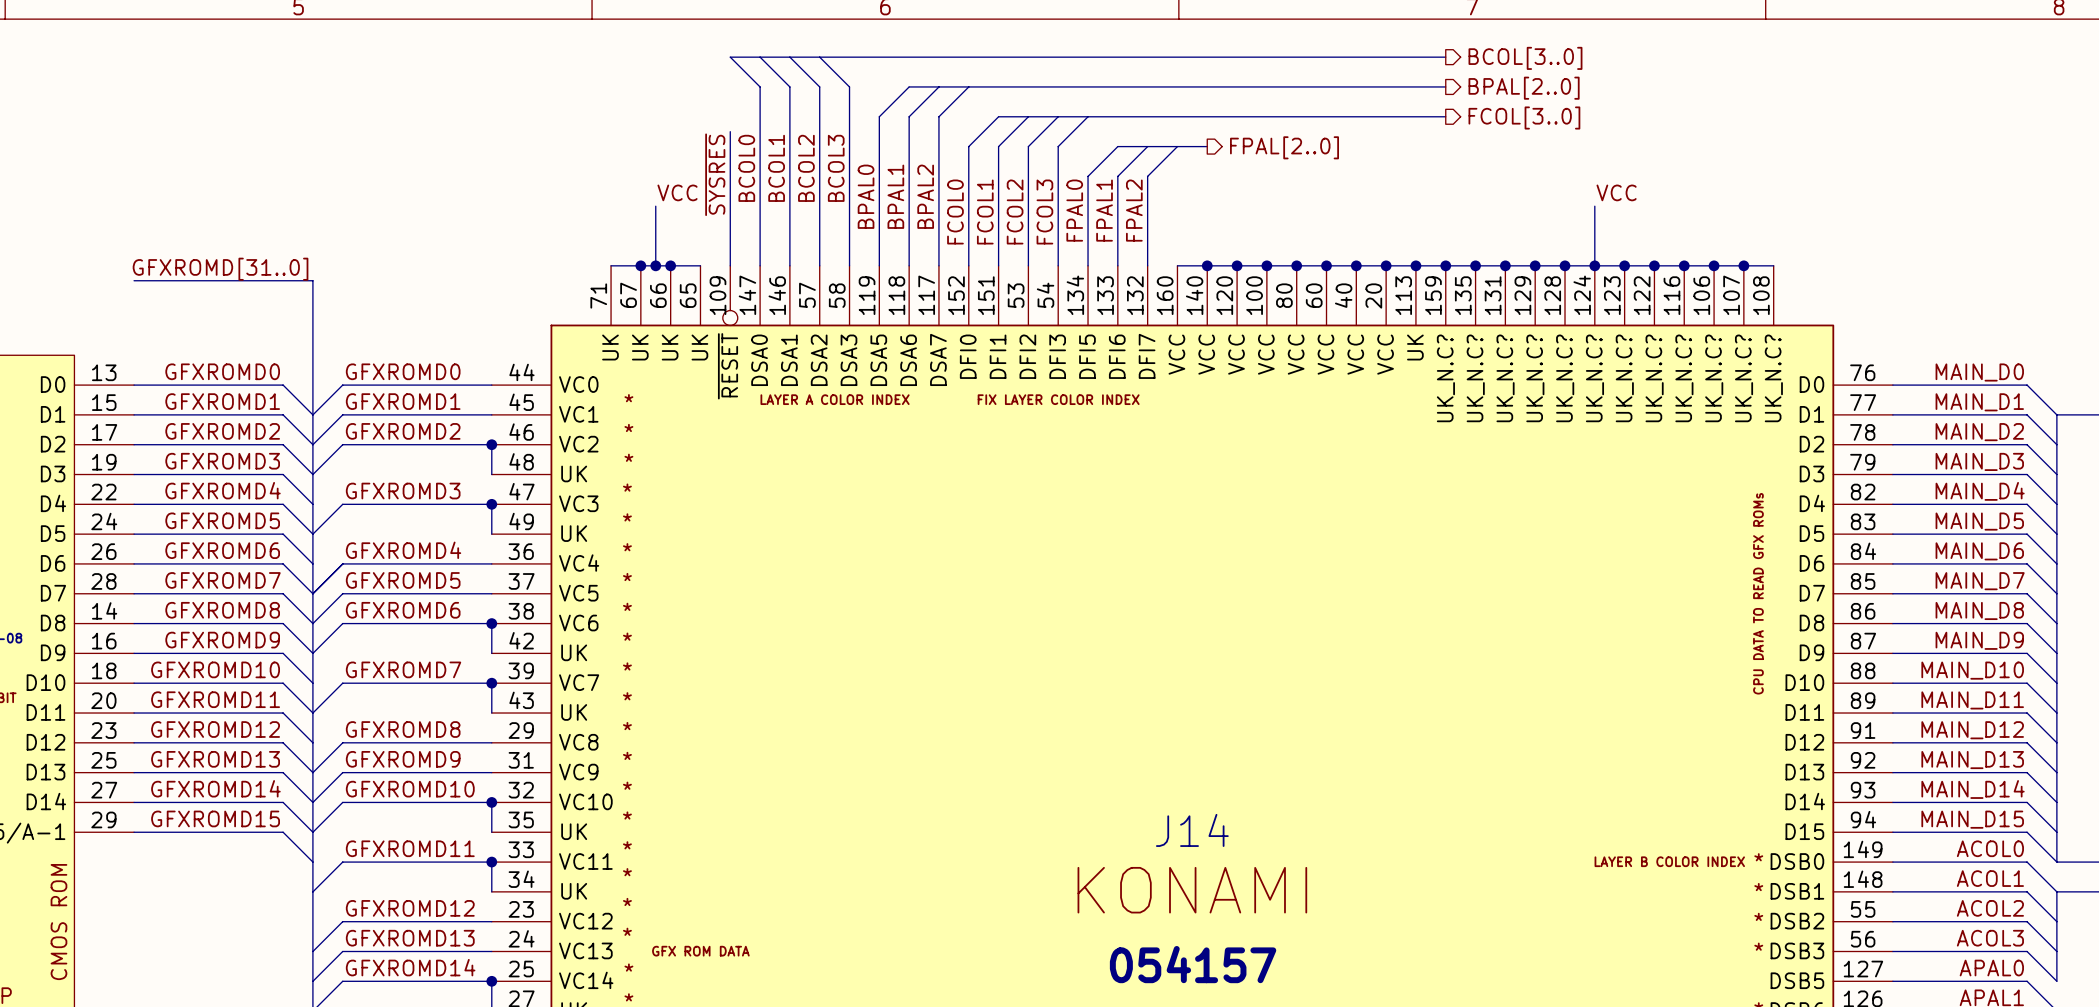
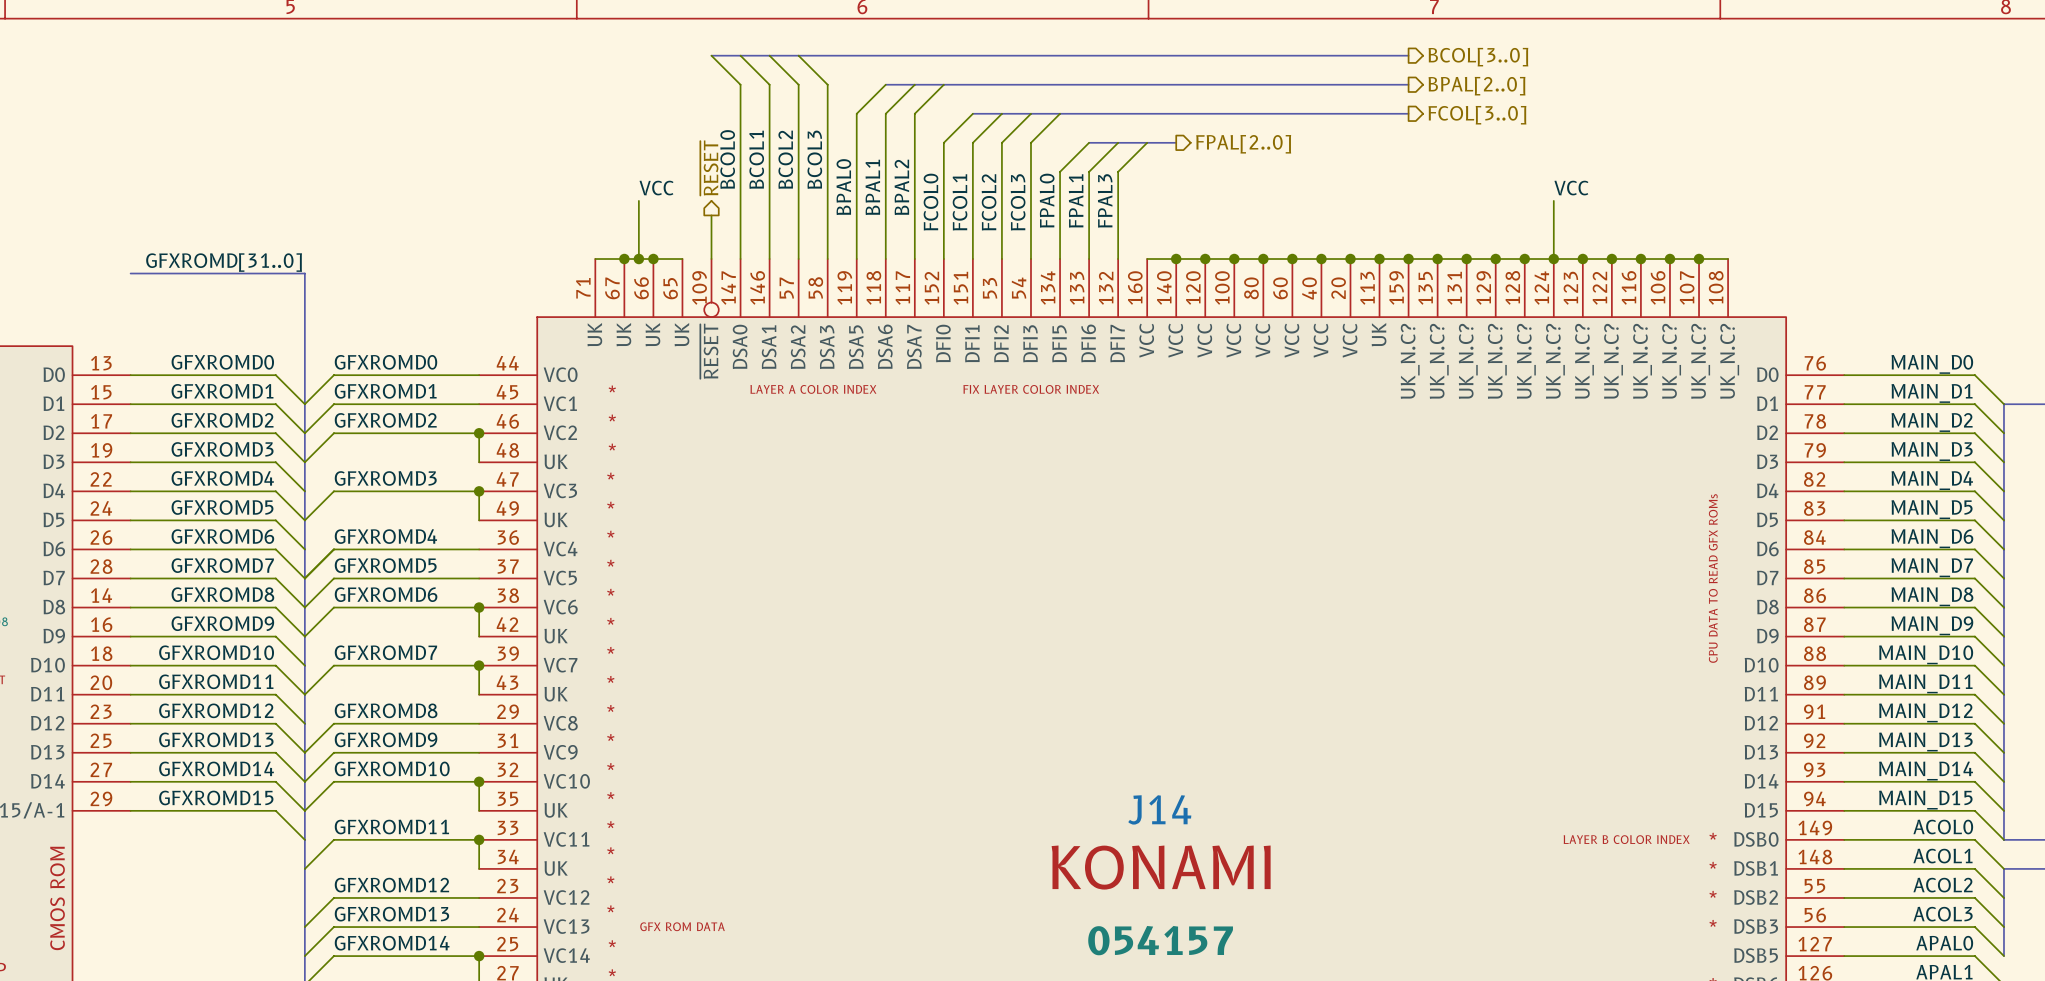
wire: (730, 131) (730, 221) -> none
hierarchical label: none -> ~{RESET} (709, 168)
label: ~{SYSRES} (715, 174) -> none
label: FPAL2 (1134, 210) -> FPAL3 (1105, 200)

